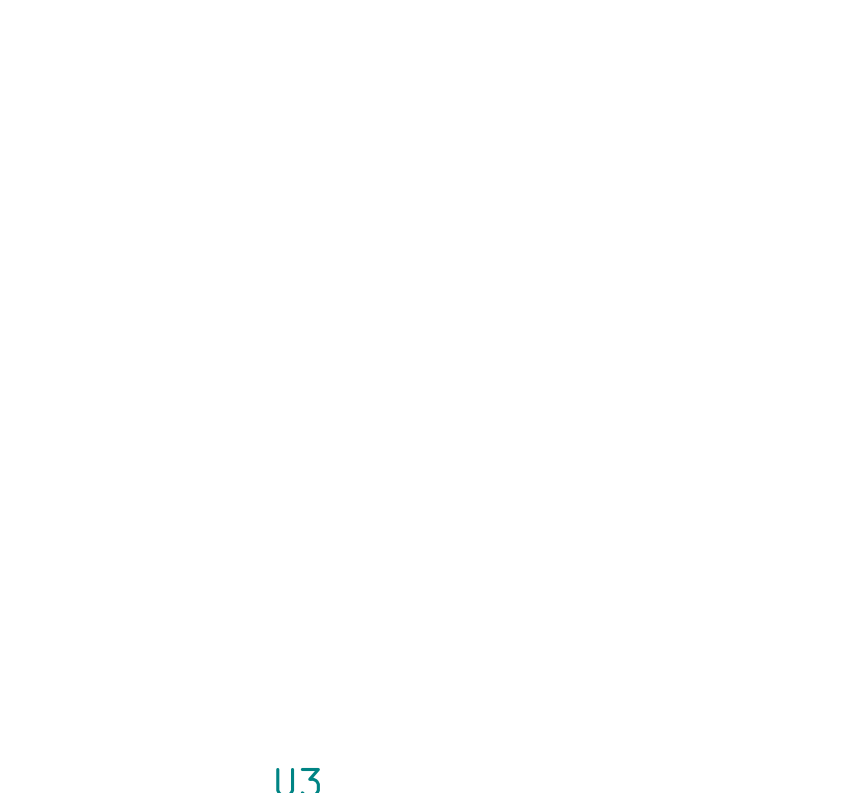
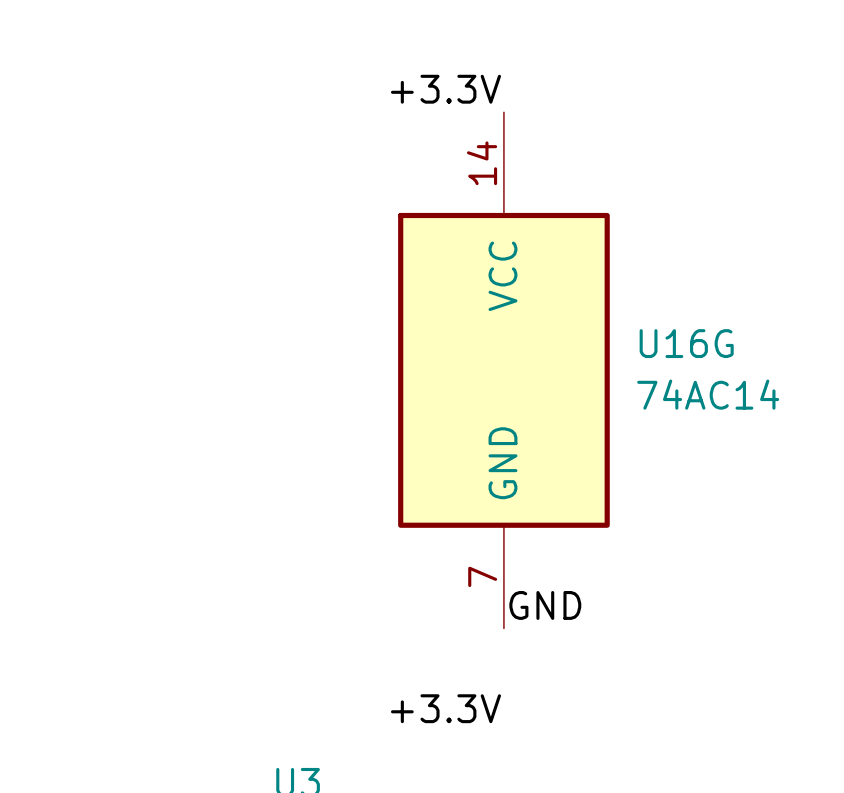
label: none -> +3.3V (445, 89)
U16G: none -> 74AC14 (503, 370)
label: none -> GND (545, 605)
label: none -> +3.3V (445, 708)

